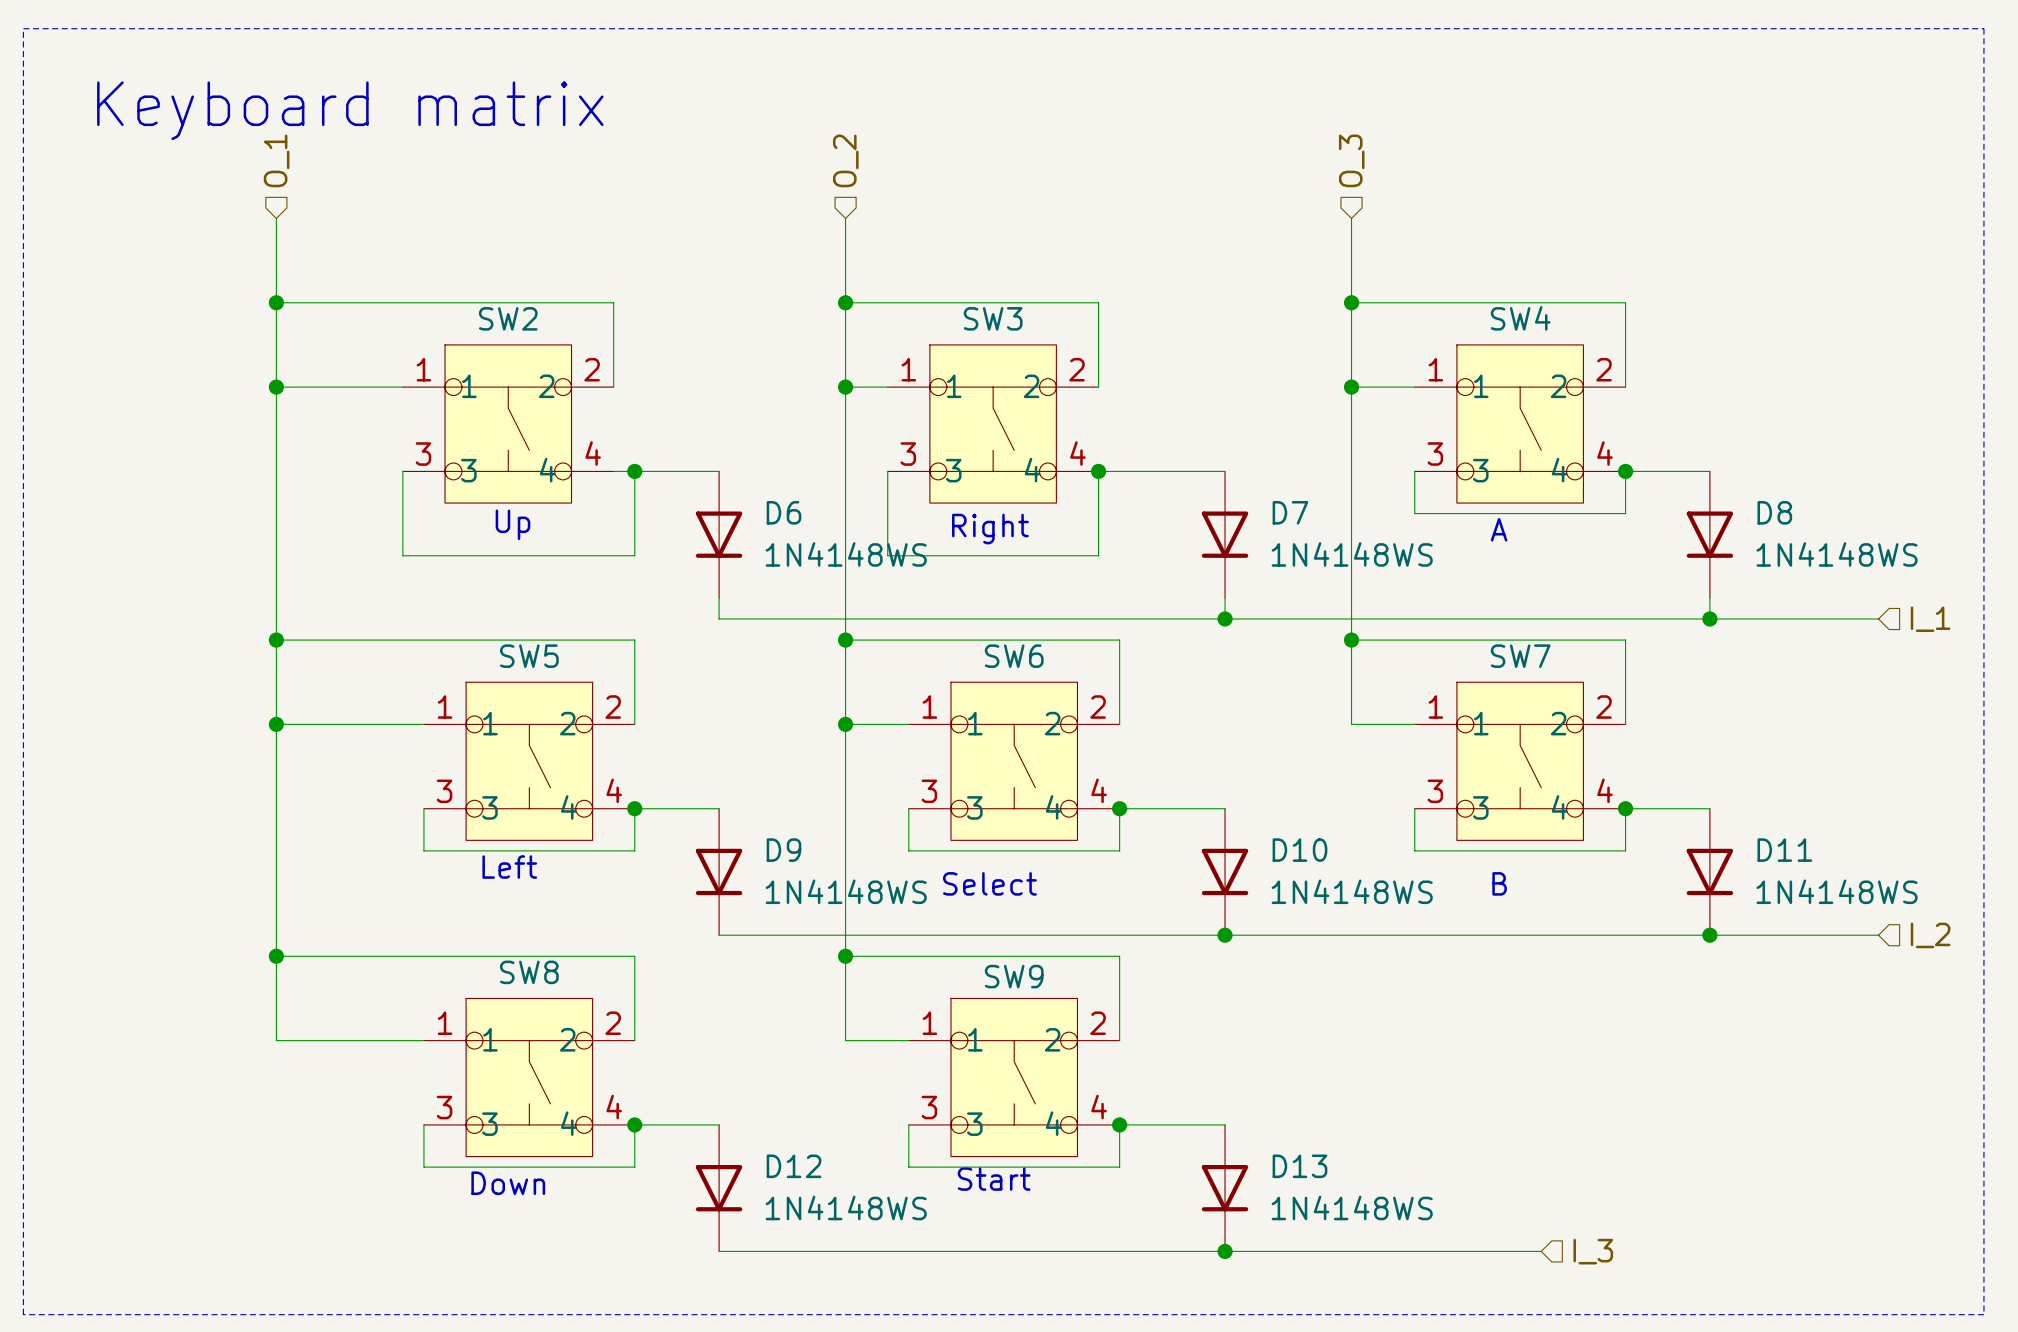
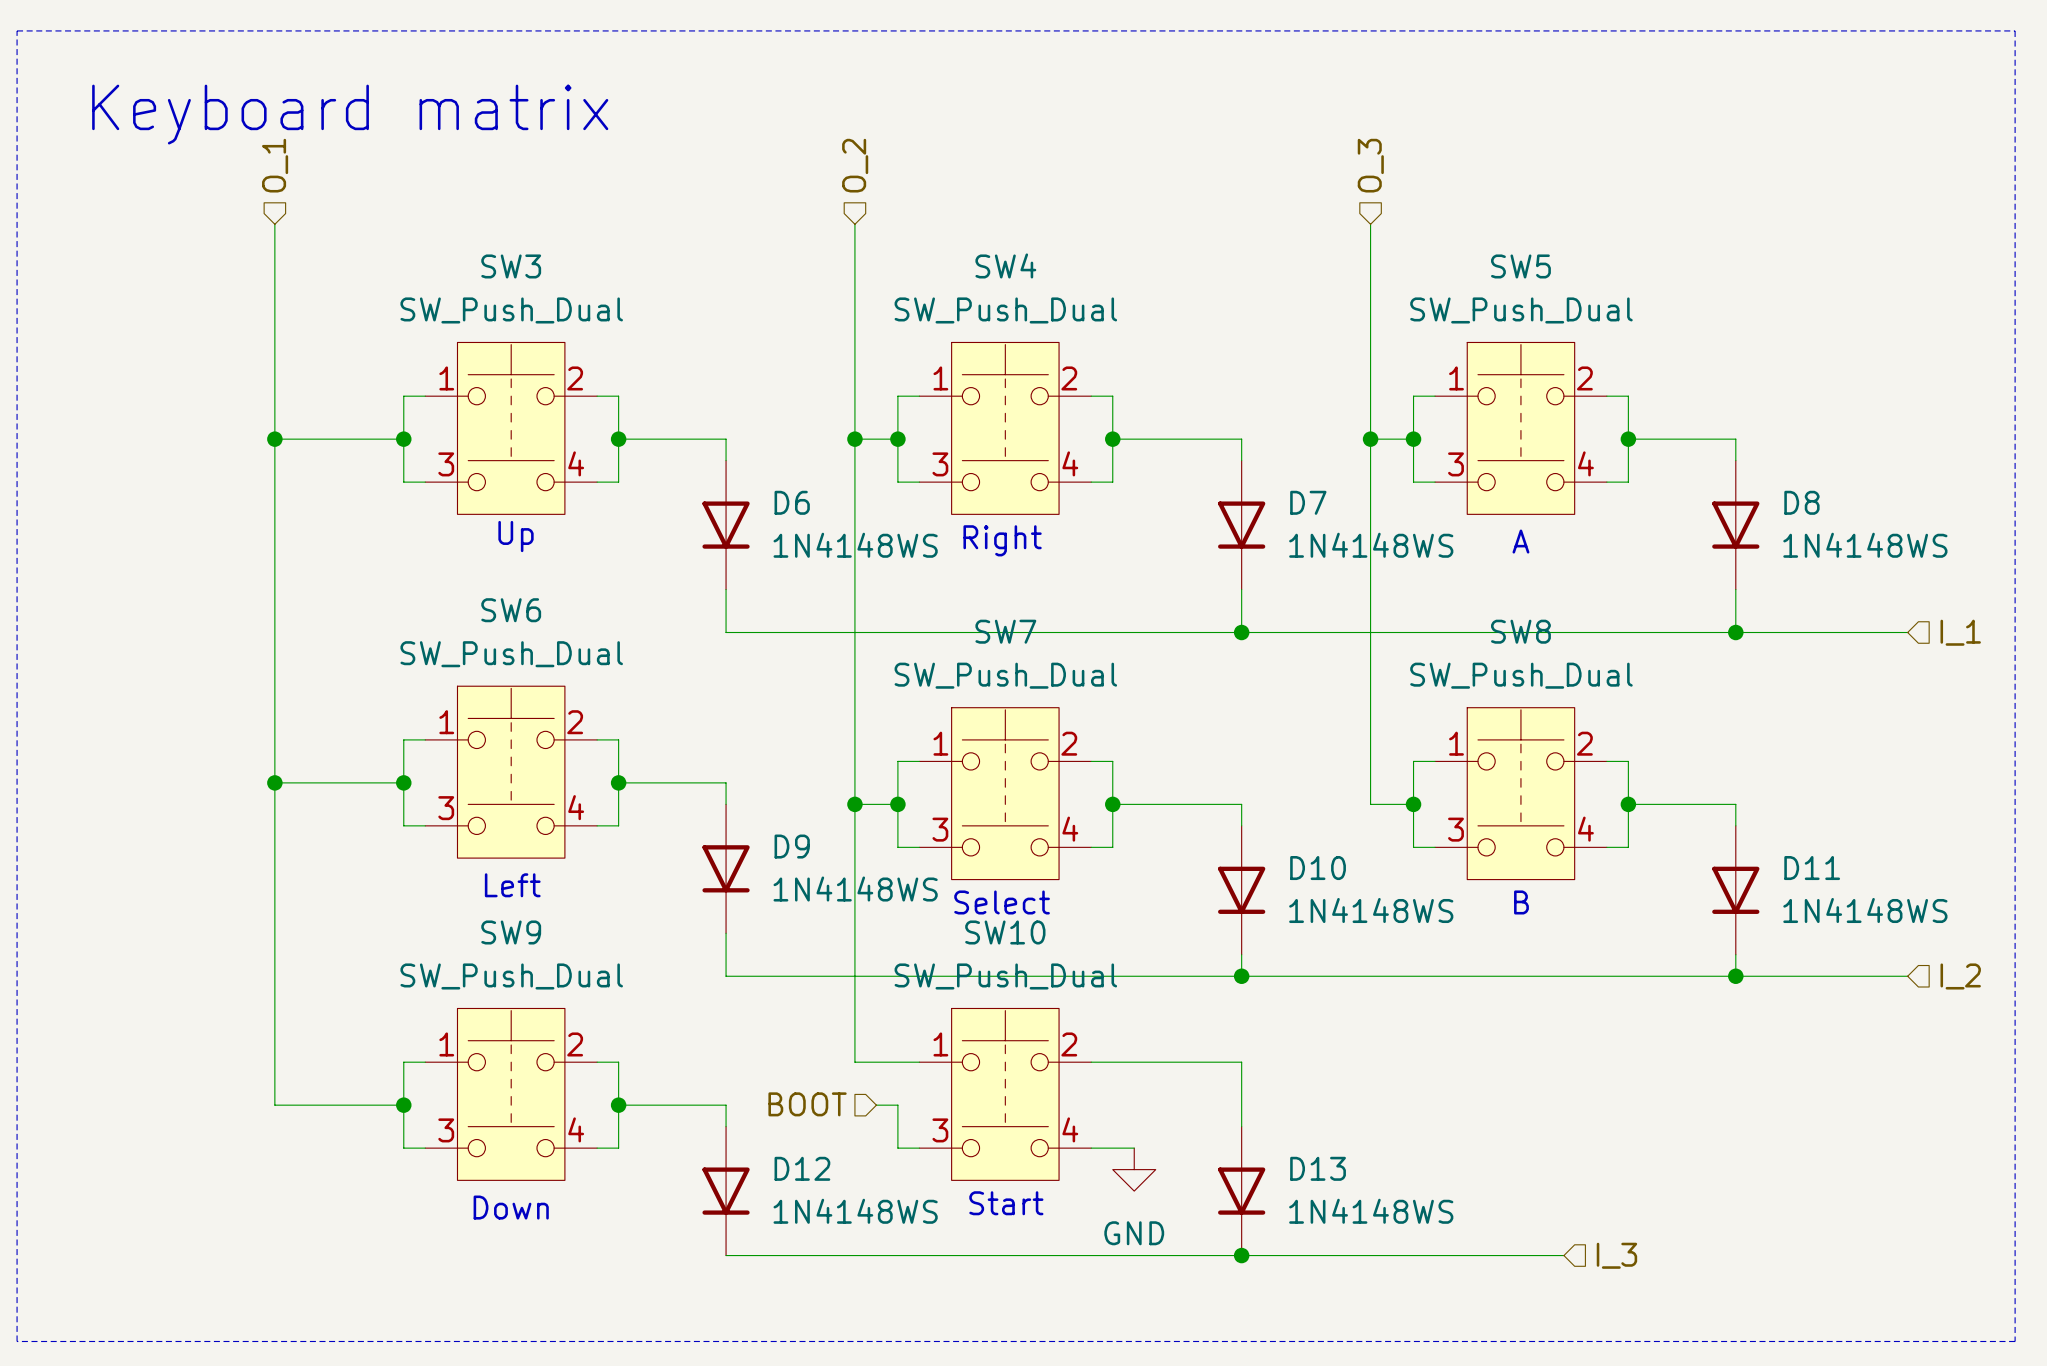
wire: (276, 302) (613, 302) (613, 387) -> none
junction: (276, 302) -> none
SW3 value: none -> SW_Push_Dual (511, 310)
wire: (845, 302) (1098, 302) (1098, 387) -> none
junction: (845, 302) -> none
SW4 value: none -> SW_Push_Dual (1005, 310)
wire: (1351, 302) (1625, 302) (1625, 387) -> none
junction: (1351, 302) -> none
SW5 value: none -> SW_Push_Dual (1521, 310)
SW3 name position: SW3 (993, 318) -> SW3 (511, 266)
SW4 name position: SW4 (1520, 318) -> SW4 (1005, 265)
SW3 symbol: [887, 344, 1099, 504] -> [425, 342, 598, 515]
SW4 symbol: [1414, 344, 1626, 504] -> [919, 342, 1092, 515]
wire: (276, 387) (402, 387) -> (274, 439) (403, 439)
junction position: (276, 387) -> (274, 439)
wire: none -> (425, 396) (403, 396) (403, 482) (425, 482)
wire: none -> (597, 396) (618, 396) (618, 482) (597, 482)
wire: (845, 387) (887, 387) -> (854, 439) (897, 439)
junction: (845, 387) -> none
wire: none -> (919, 396) (897, 396) (897, 482) (919, 482)
wire: none -> (1091, 396) (1112, 396) (1112, 482) (1091, 482)
wire: (1351, 387) (1393, 387) -> (1435, 482) (1413, 482) (1413, 396)
junction: (1351, 387) -> none
wire: none -> (1606, 396) (1628, 396) (1628, 482) (1606, 482)
SW2: (508, 423) -> none
junction: none -> (403, 439)
wire: none -> (618, 439) (726, 439) (726, 460)
junction: none -> (854, 439)
junction: none -> (897, 439)
wire: none -> (1112, 439) (1241, 439) (1241, 460)
wire: none -> (1370, 439) (1413, 439)
junction: none -> (1370, 439)
junction: none -> (1413, 439)
wire: none -> (1628, 439) (1735, 439) (1735, 460)
wire: (402, 471) (402, 555) (634, 555) (634, 471) -> none
wire: (613, 471) (719, 471) -> none
junction position: (634, 471) -> (618, 439)
wire: (887, 471) (887, 555) (1098, 555) (1098, 471) (1225, 471) -> none
junction position: (1098, 471) -> (1112, 439)
wire: (1414, 471) (1414, 513) (1625, 513) (1625, 471) (1709, 471) -> none
junction position: (1625, 471) -> (1628, 439)
D6 position: (719, 534) -> (726, 525)
D7 position: (1225, 534) -> (1241, 525)
D8 position: (1709, 534) -> (1735, 525)
wire: (276, 640) (634, 640) (634, 724) -> none
junction: (276, 640) -> none
SW6 value: none -> SW_Push_Dual (511, 654)
wire: (845, 640) (1119, 640) (1119, 724) -> none
junction: (845, 640) -> none
wire: (1351, 640) (1625, 640) (1625, 724) -> none
junction: (1351, 640) -> none
SW5 name position: SW5 (529, 656) -> SW5 (1520, 266)
SW6 name position: SW6 (1014, 656) -> SW6 (511, 610)
SW7 name position: SW7 (1520, 656) -> SW7 (1005, 631)
SW7 value: none -> SW_Push_Dual (1005, 675)
SW8 value: none -> SW_Push_Dual (1521, 675)
SW5 symbol: [423, 682, 635, 841] -> [1435, 342, 1607, 515]
SW6 symbol: [908, 682, 1120, 841] -> [425, 686, 598, 859]
SW7 symbol: [1414, 682, 1626, 841] -> [919, 707, 1092, 880]
wire: (276, 724) (402, 724) -> (425, 825) (403, 825) (403, 739)
junction position: (276, 724) -> (274, 782)
wire: none -> (597, 739) (618, 739) (618, 825) (597, 825)
wire: (845, 724) (908, 724) -> none
junction: (845, 724) -> none
wire: (1351, 724) (1414, 724) -> (1370, 739) (1370, 804) (1413, 804)
wire: none -> (919, 761) (897, 761) (897, 847) (919, 847)
wire: none -> (1091, 761) (1112, 761) (1112, 847) (1091, 847)
wire: none -> (1435, 761) (1413, 761) (1413, 847) (1435, 847)
wire: none -> (1606, 761) (1628, 761) (1628, 847) (1606, 847)
wire: none -> (274, 782) (403, 782)
junction: none -> (403, 782)
wire: none -> (618, 782) (726, 782) (726, 804)
wire: none -> (854, 804) (897, 804)
junction: none -> (854, 804)
junction: none -> (897, 804)
junction: none -> (1413, 804)
wire: (423, 808) (423, 850) (634, 850) (634, 808) (719, 808) -> none
junction position: (634, 808) -> (618, 782)
wire: (908, 808) (908, 850) (1119, 850) (1119, 808) (1225, 808) -> (1112, 804) (1241, 804) (1241, 825)
junction position: (1119, 808) -> (1112, 804)
wire: (1414, 808) (1414, 850) (1625, 850) (1625, 808) (1709, 808) -> (1628, 804) (1735, 804) (1735, 825)
junction position: (1625, 808) -> (1628, 804)
D9 position: (719, 871) -> (726, 868)
wire: none -> (726, 933) (726, 976) (854, 976)
wire: (719, 935) (1878, 935) -> none
wire: none -> (1241, 954) (1241, 976)
junction position: (1225, 935) -> (1241, 976)
wire: none -> (1735, 954) (1735, 976)
junction position: (1709, 935) -> (1735, 976)
hierarchical label position: I_2 (1930, 935) -> I_2 (1960, 976)
wire: (276, 956) (634, 956) (634, 1040) -> none
junction: (276, 956) -> none
SW9 value: none -> SW_Push_Dual (511, 976)
junction: (845, 956) -> none
wire: (1119, 956) (1119, 1040) -> (1134, 976) (1907, 976)
SW8 name position: SW8 (529, 972) -> SW8 (1520, 631)
SW9 name position: SW9 (1014, 976) -> SW9 (511, 932)
SW8 symbol: [423, 998, 635, 1157] -> [1435, 707, 1607, 880]
SW9 symbol: [908, 998, 1120, 1157] -> [425, 1008, 598, 1181]
wire: (276, 1040) (402, 1040) -> (274, 1062) (274, 1105) (403, 1105)
wire: none -> (597, 1062) (618, 1062) (618, 1148) (597, 1148)
wire: none -> (1091, 1062) (1241, 1062) (1241, 1126)
SW10: none -> SW_Push_Dual (1005, 1094)
hierarchical label: none -> BOOT (807, 1104)
junction: none -> (403, 1105)
wire: none -> (618, 1105) (726, 1105) (726, 1126)
wire: (423, 1124) (423, 1167) (634, 1167) (634, 1124) (719, 1124) -> (425, 1148) (403, 1148) (403, 1062)
junction position: (634, 1124) -> (618, 1105)
wire: (908, 1124) (908, 1167) (1119, 1167) (1119, 1124) (1225, 1124) -> (919, 1148) (897, 1148) (897, 1105) (876, 1105)
junction: (1119, 1124) -> none
power symbol: none -> GND (1134, 1169)
D12 position: (719, 1188) -> (726, 1191)
D13 position: (1225, 1188) -> (1241, 1191)
wire: (719, 1251) (1541, 1251) -> (726, 1255) (1563, 1255)
junction position: (1225, 1251) -> (1241, 1255)
hierarchical label position: I_3 (1593, 1251) -> I_3 (1616, 1255)

